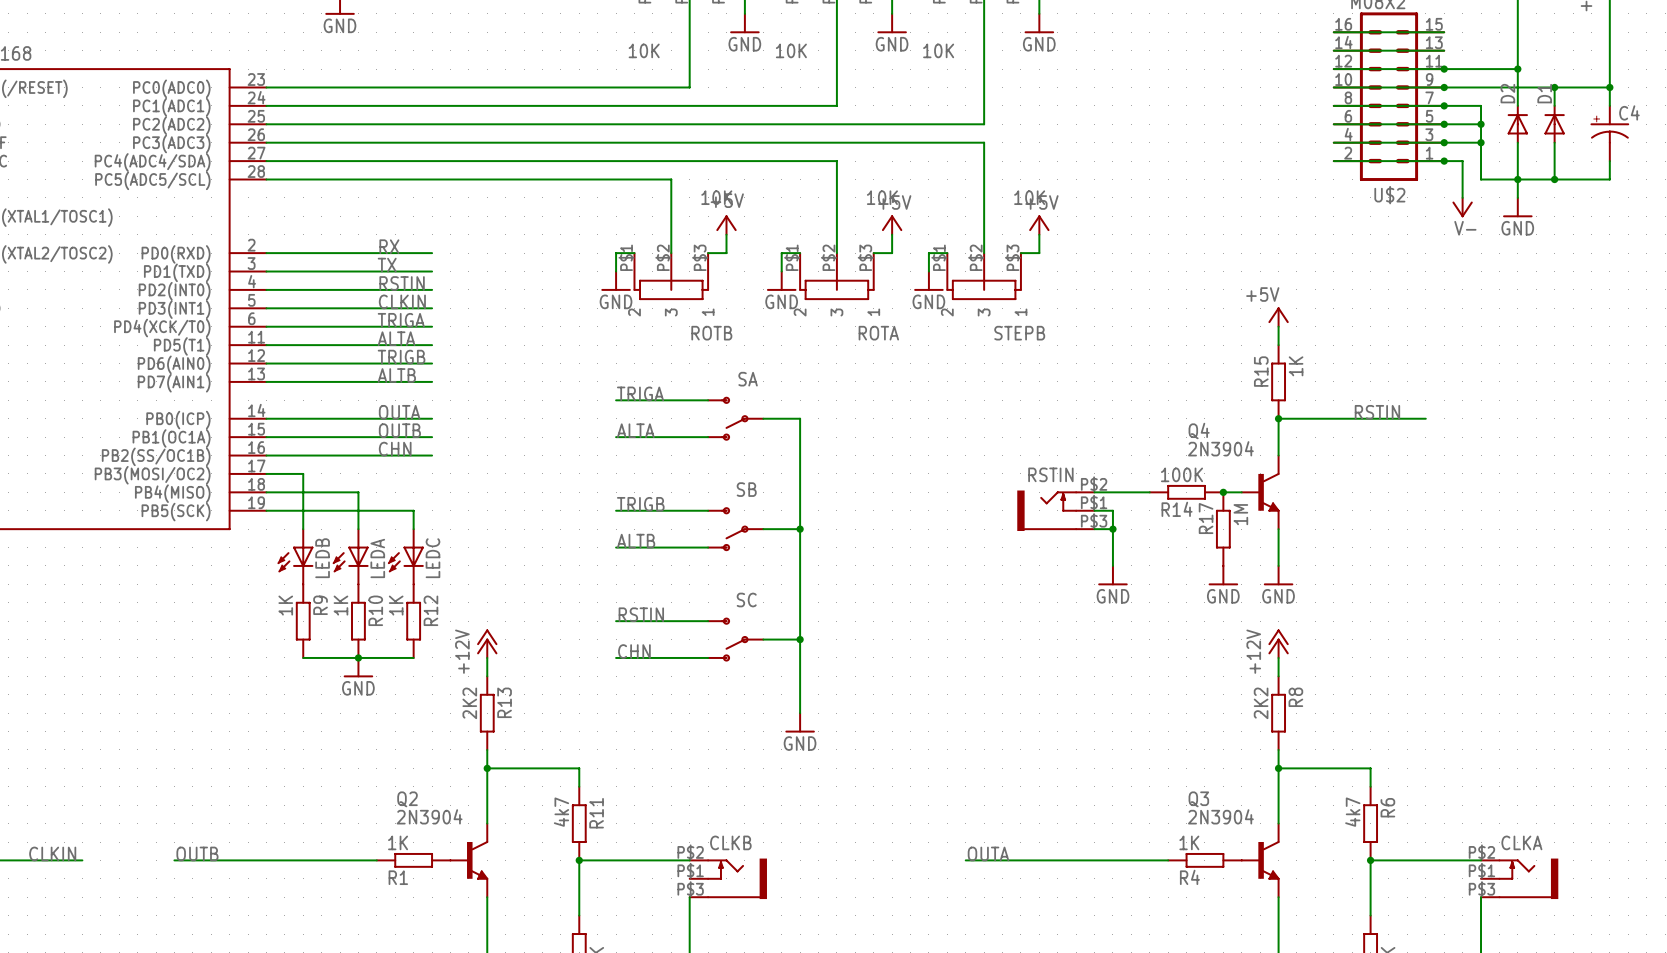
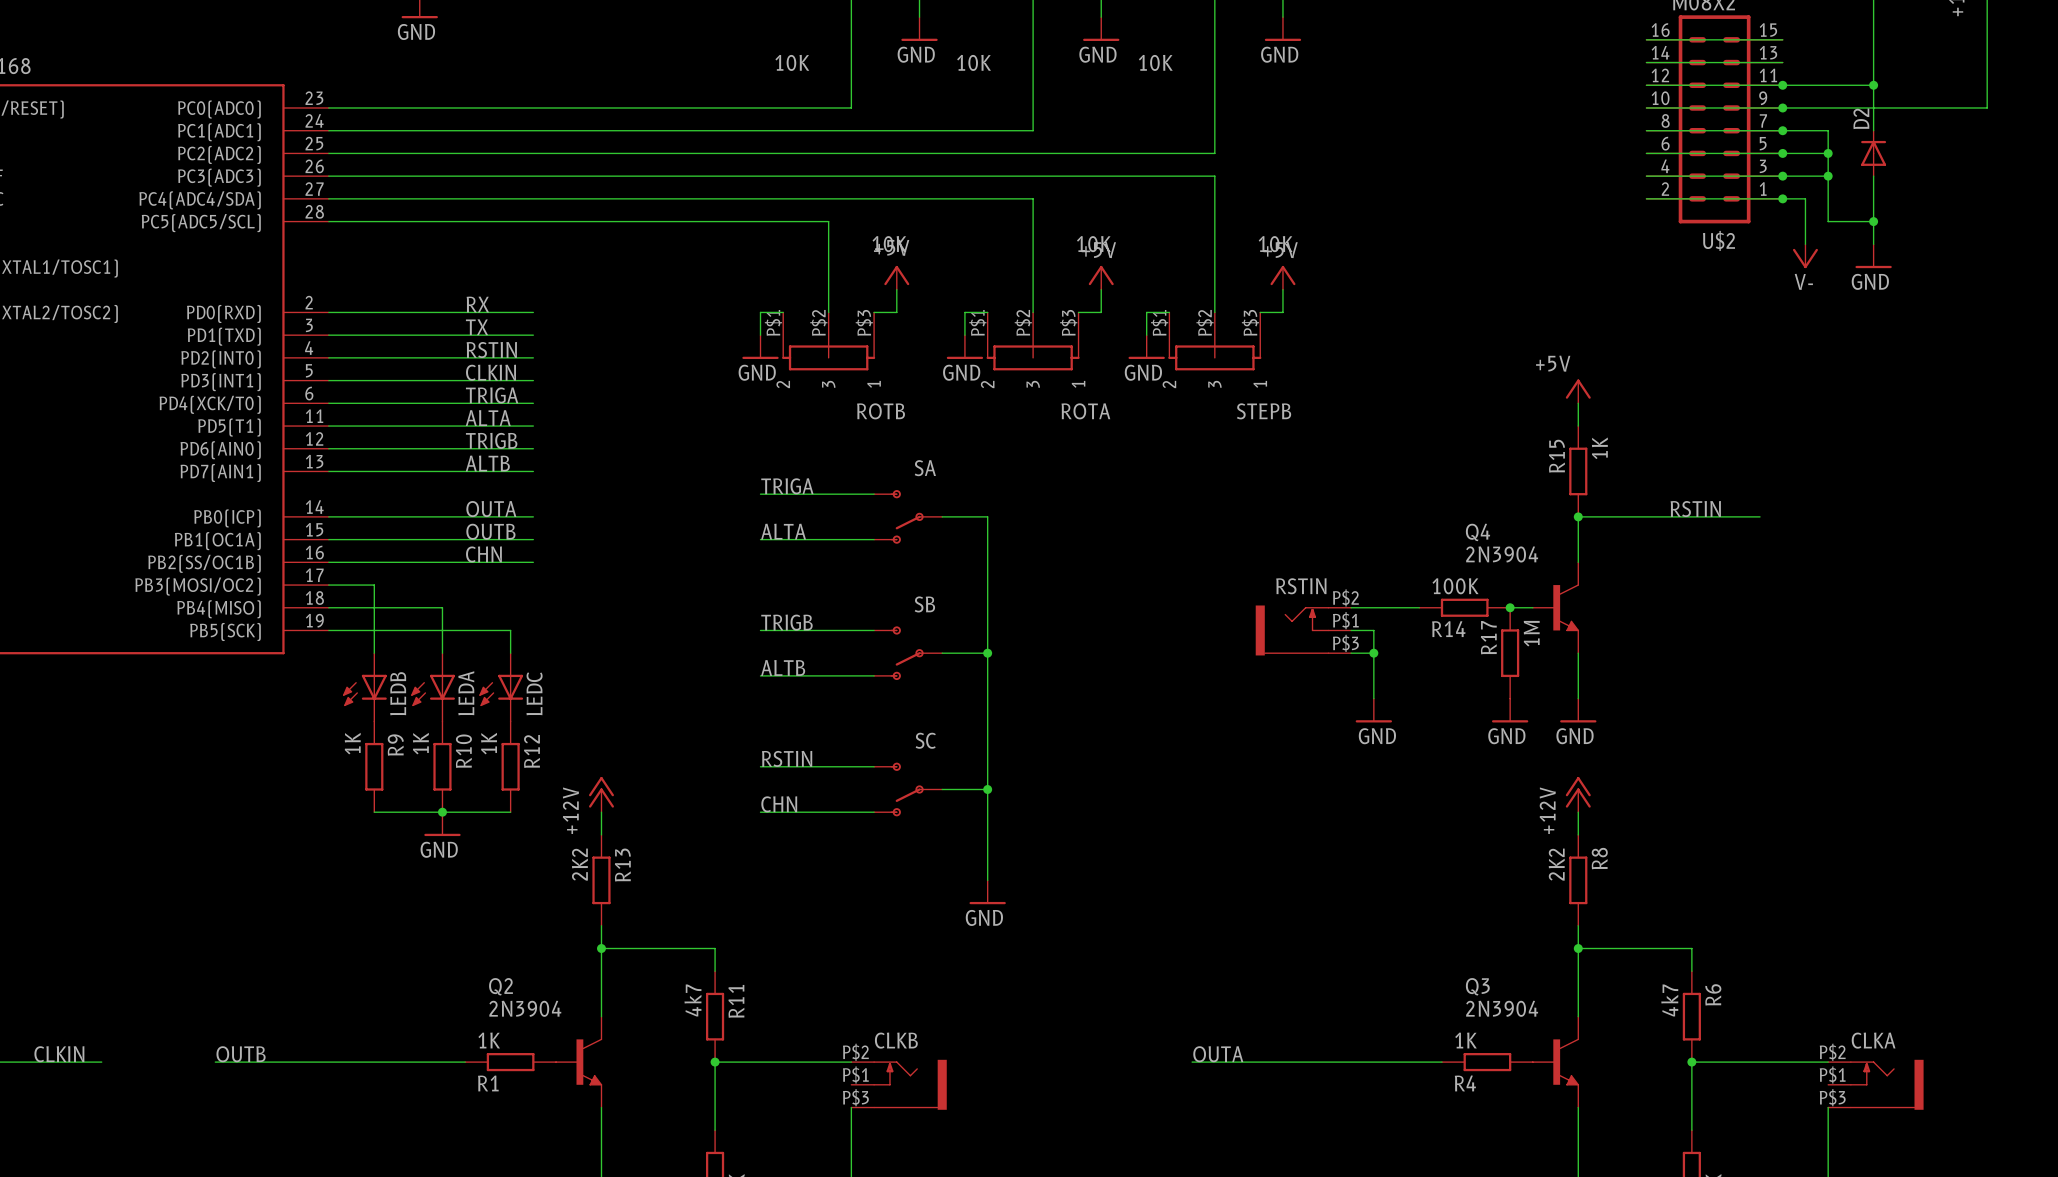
wire: (1554, 87) (1554, 105) -> none
junction: (1554, 87) -> none
wire: (1609, 87) (1609, 105) -> none
junction: (1609, 87) -> none
D1: (1554, 124) -> none
C4: (1609, 133) -> none
wire: (1554, 142) (1554, 179) -> none
wire: (1609, 161) (1609, 179) (1517, 179) -> none
junction: (1554, 179) -> none

